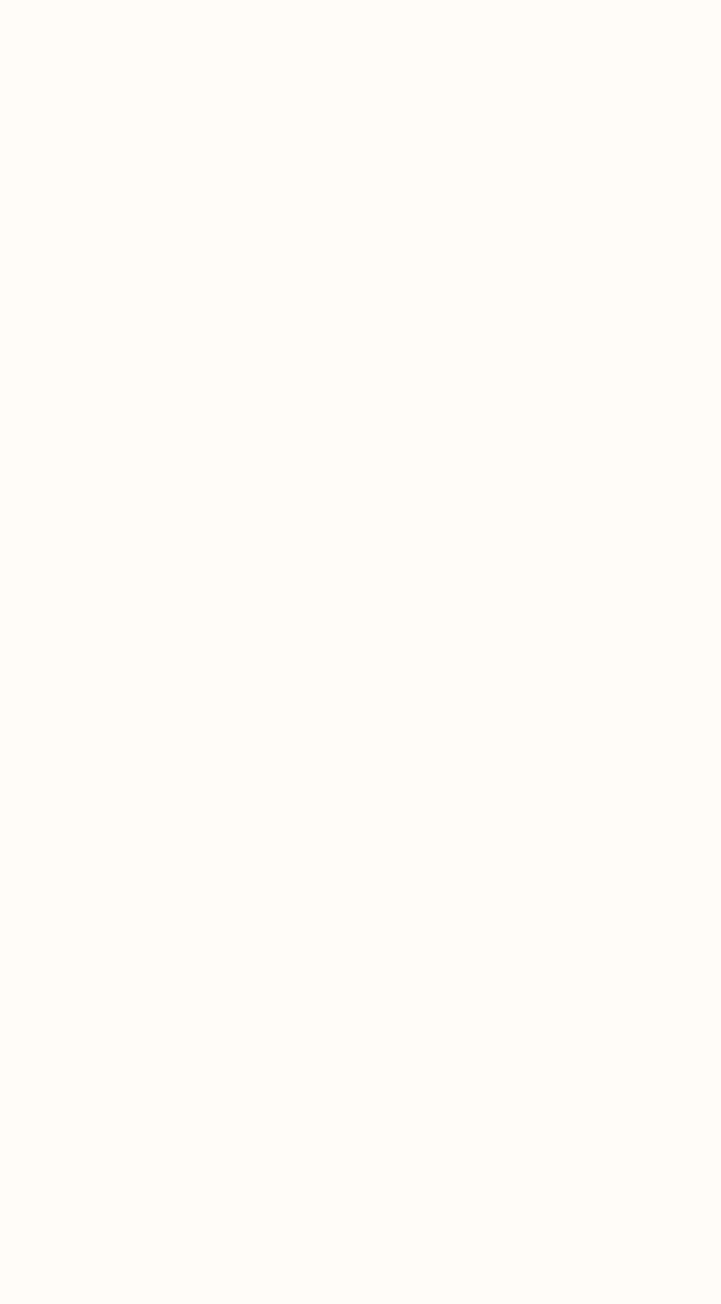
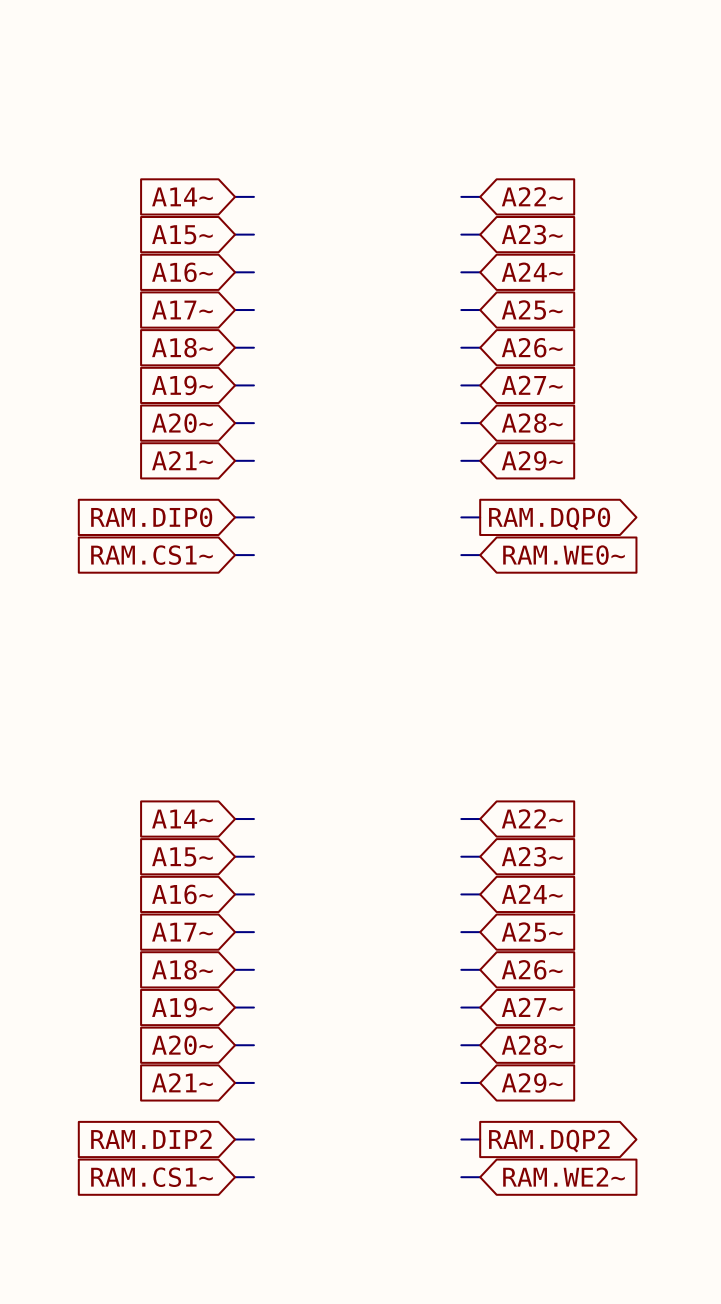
global label: none -> A14~ (182, 196)
wire: none -> (235, 196) (253, 196)
wire: none -> (461, 196) (480, 196)
global label: none -> A22~ (532, 196)
global label: none -> A15~ (182, 234)
wire: none -> (235, 234) (253, 234)
wire: none -> (461, 234) (480, 234)
global label: none -> A23~ (532, 234)
global label: none -> A24~ (532, 272)
global label: none -> A16~ (182, 272)
wire: none -> (235, 272) (253, 272)
wire: none -> (461, 272) (480, 272)
global label: none -> A17~ (182, 310)
wire: none -> (235, 310) (253, 310)
wire: none -> (461, 310) (480, 310)
global label: none -> A25~ (532, 310)
global label: none -> A18~ (182, 347)
wire: none -> (235, 347) (253, 347)
wire: none -> (461, 347) (480, 347)
global label: none -> A26~ (532, 347)
global label: none -> A19~ (182, 385)
wire: none -> (235, 385) (253, 385)
wire: none -> (461, 385) (480, 385)
global label: none -> A27~ (532, 385)
global label: none -> A20~ (182, 423)
wire: none -> (235, 423) (253, 423)
wire: none -> (461, 423) (480, 423)
global label: none -> A28~ (532, 423)
global label: none -> A21~ (182, 460)
wire: none -> (235, 460) (253, 460)
wire: none -> (461, 460) (480, 460)
global label: none -> A29~ (532, 460)
global label: none -> RAM.DIP0 (151, 517)
wire: none -> (235, 517) (253, 517)
wire: none -> (461, 517) (480, 517)
global label: none -> RAM.DQP0 (549, 518)
global label: none -> RAM.CS1~ (151, 555)
wire: none -> (235, 555) (253, 555)
wire: none -> (461, 555) (480, 555)
global label: none -> RAM.WE0~ (564, 555)
global label: none -> A14~ (182, 819)
wire: none -> (235, 819) (253, 819)
wire: none -> (461, 819) (480, 819)
global label: none -> A22~ (532, 818)
global label: none -> A15~ (182, 856)
wire: none -> (235, 856) (253, 856)
wire: none -> (461, 856) (480, 856)
global label: none -> A23~ (532, 856)
global label: none -> A24~ (532, 894)
global label: none -> A16~ (182, 894)
wire: none -> (235, 894) (253, 894)
wire: none -> (461, 894) (480, 894)
global label: none -> A17~ (182, 932)
wire: none -> (235, 932) (253, 932)
wire: none -> (461, 932) (480, 932)
global label: none -> A25~ (532, 932)
global label: none -> A18~ (182, 969)
wire: none -> (235, 969) (253, 969)
wire: none -> (461, 969) (480, 969)
global label: none -> A26~ (532, 969)
global label: none -> A19~ (182, 1007)
wire: none -> (235, 1007) (253, 1007)
wire: none -> (461, 1007) (480, 1007)
global label: none -> A27~ (532, 1007)
global label: none -> A20~ (182, 1045)
wire: none -> (235, 1045) (253, 1045)
wire: none -> (461, 1045) (480, 1045)
global label: none -> A28~ (532, 1045)
global label: none -> A21~ (182, 1082)
wire: none -> (235, 1082) (253, 1082)
wire: none -> (461, 1082) (480, 1082)
global label: none -> A29~ (532, 1082)
global label: none -> RAM.DIP2 (151, 1139)
wire: none -> (235, 1139) (253, 1139)
wire: none -> (461, 1139) (480, 1139)
global label: none -> RAM.DQP2 (549, 1141)
global label: none -> RAM.CS1~ (151, 1177)
wire: none -> (235, 1177) (253, 1177)
wire: none -> (461, 1177) (480, 1177)
global label: none -> RAM.WE2~ (564, 1177)

